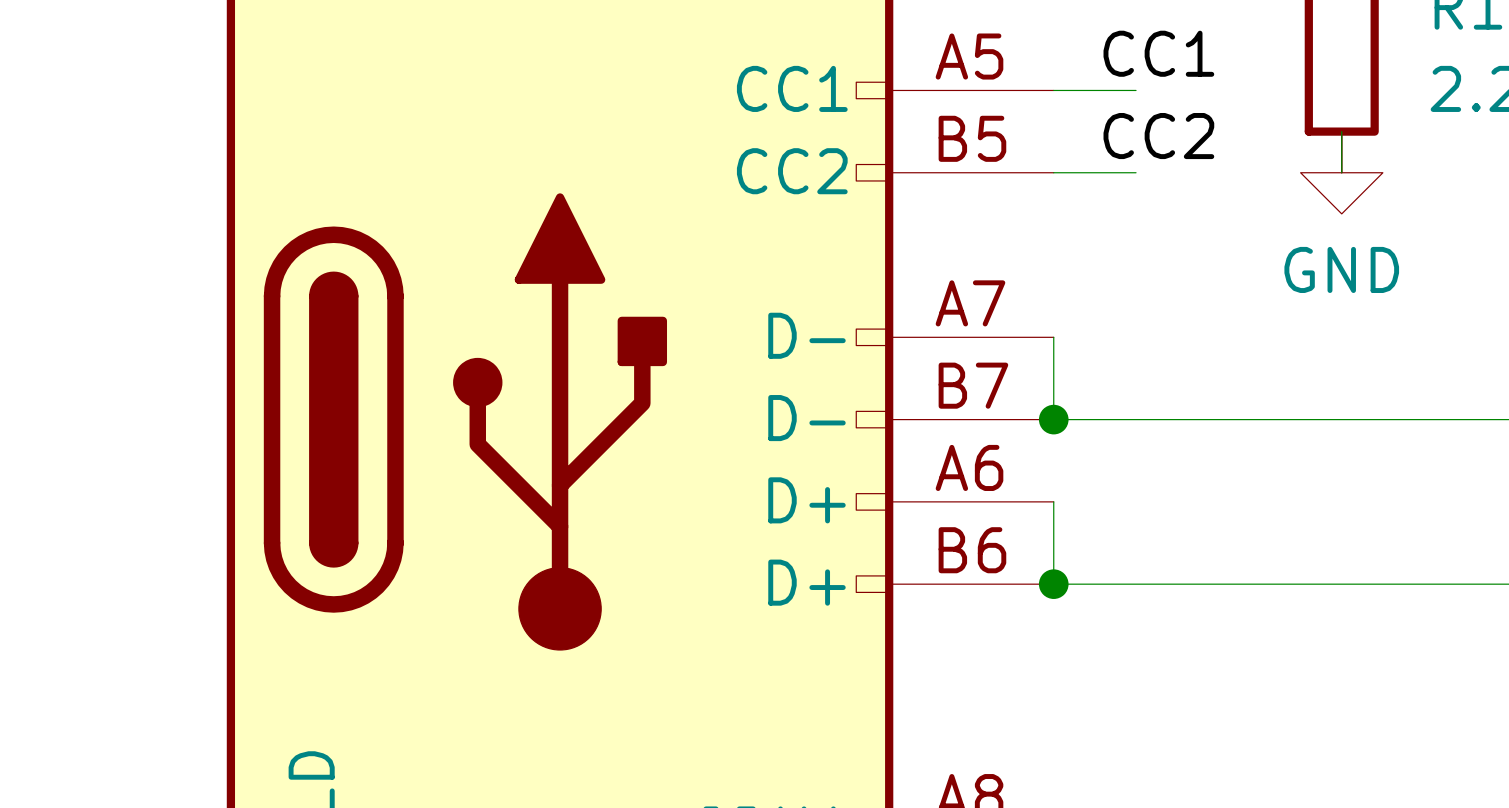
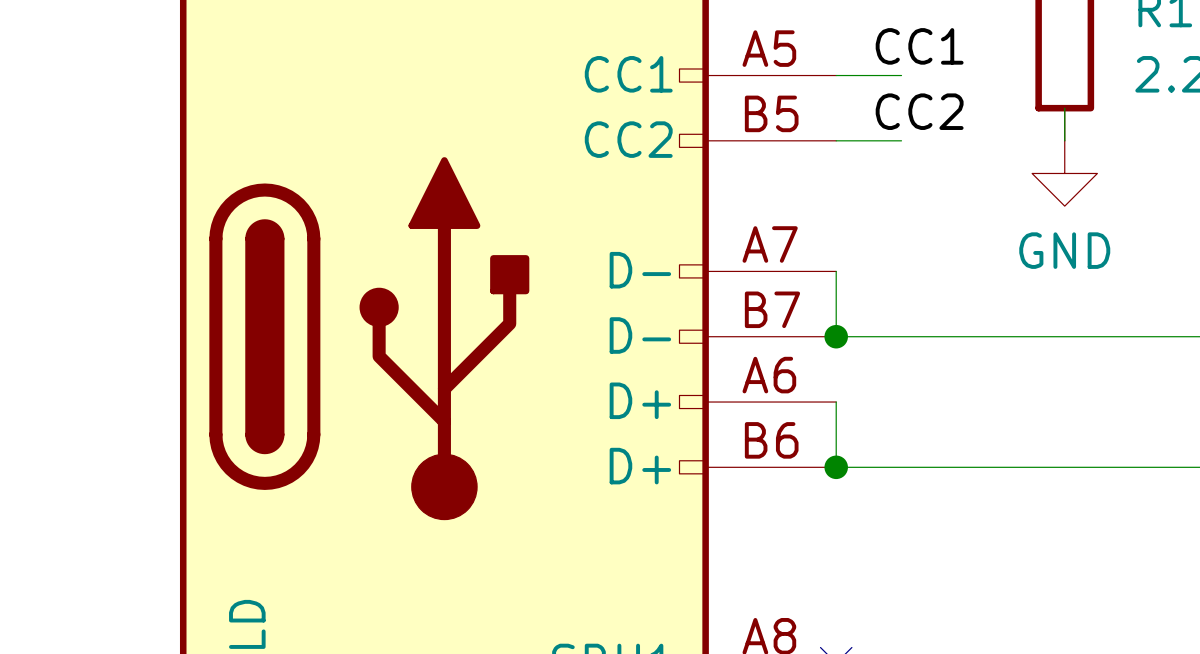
power symbol position: GND (1341, 172) -> GND (1064, 173)

